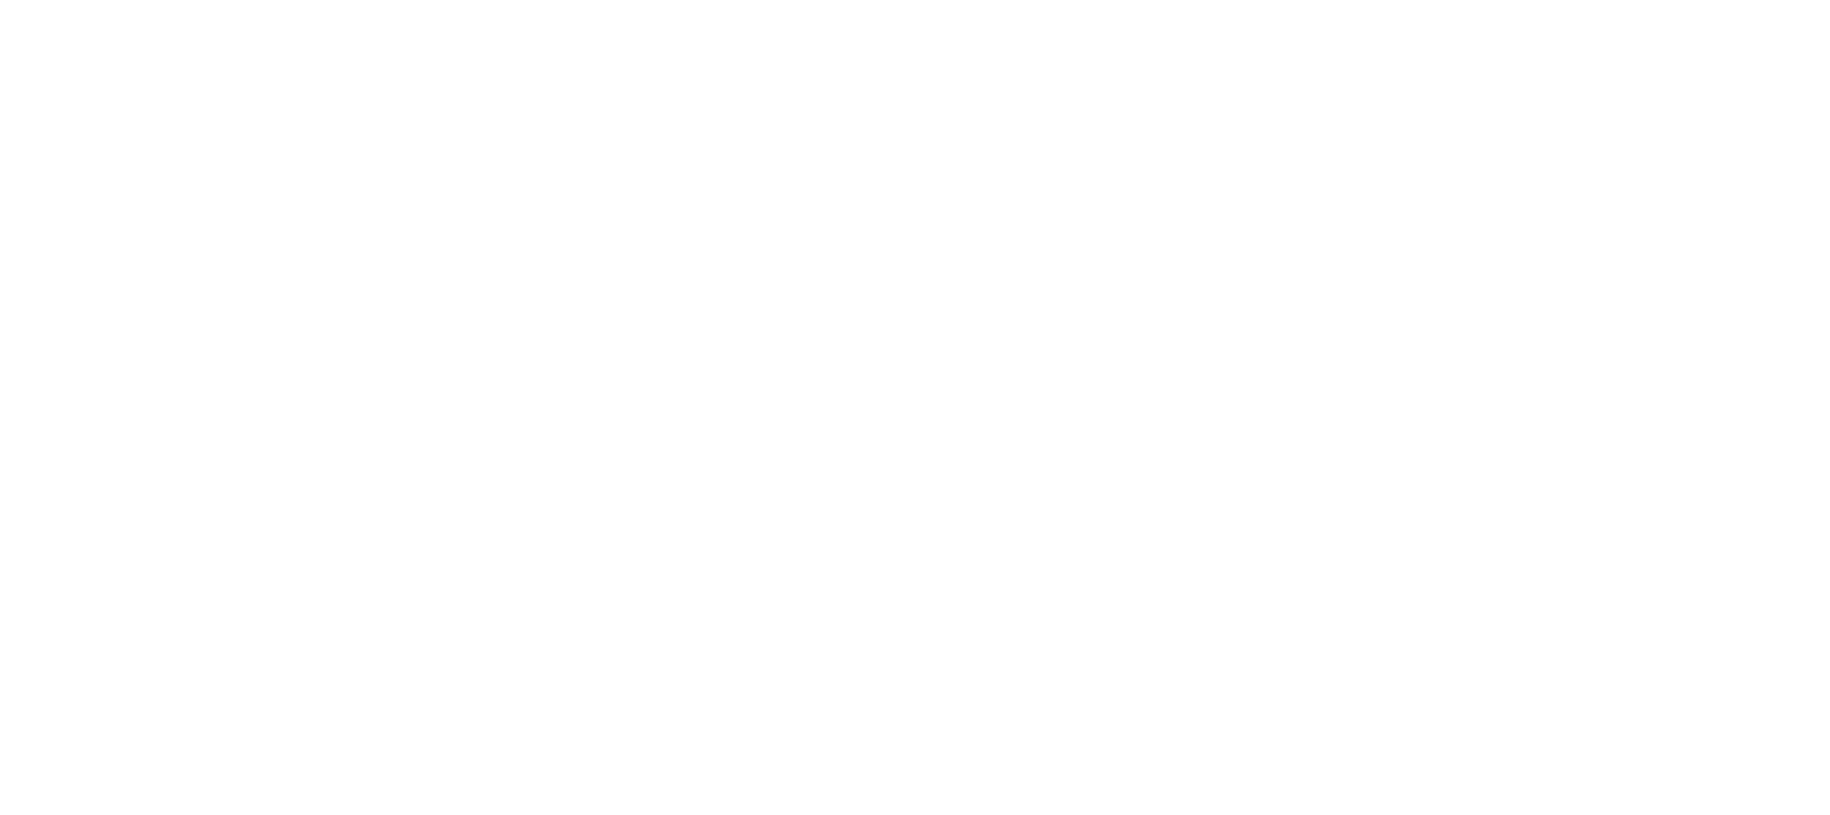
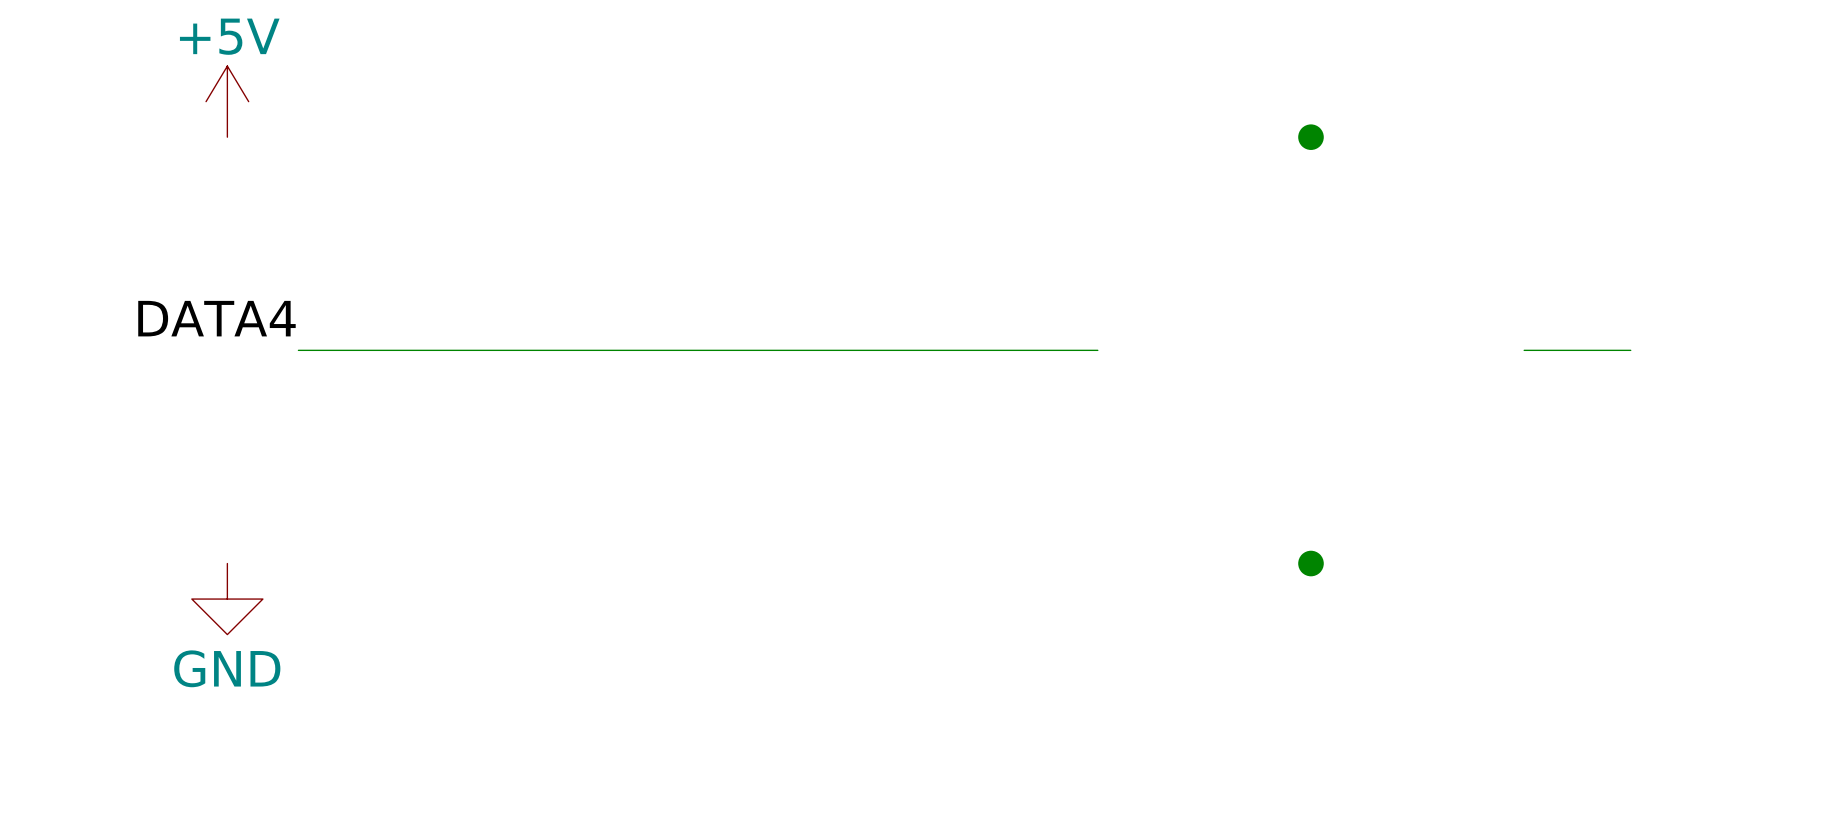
power symbol: none -> +5V (227, 101)
junction: none -> (1310, 137)
label: none -> DATA4 (216, 318)
wire: none -> (298, 350) (1097, 350)
wire: none -> (1524, 350) (1630, 350)
junction: none -> (1310, 563)
power symbol: none -> GND (227, 599)

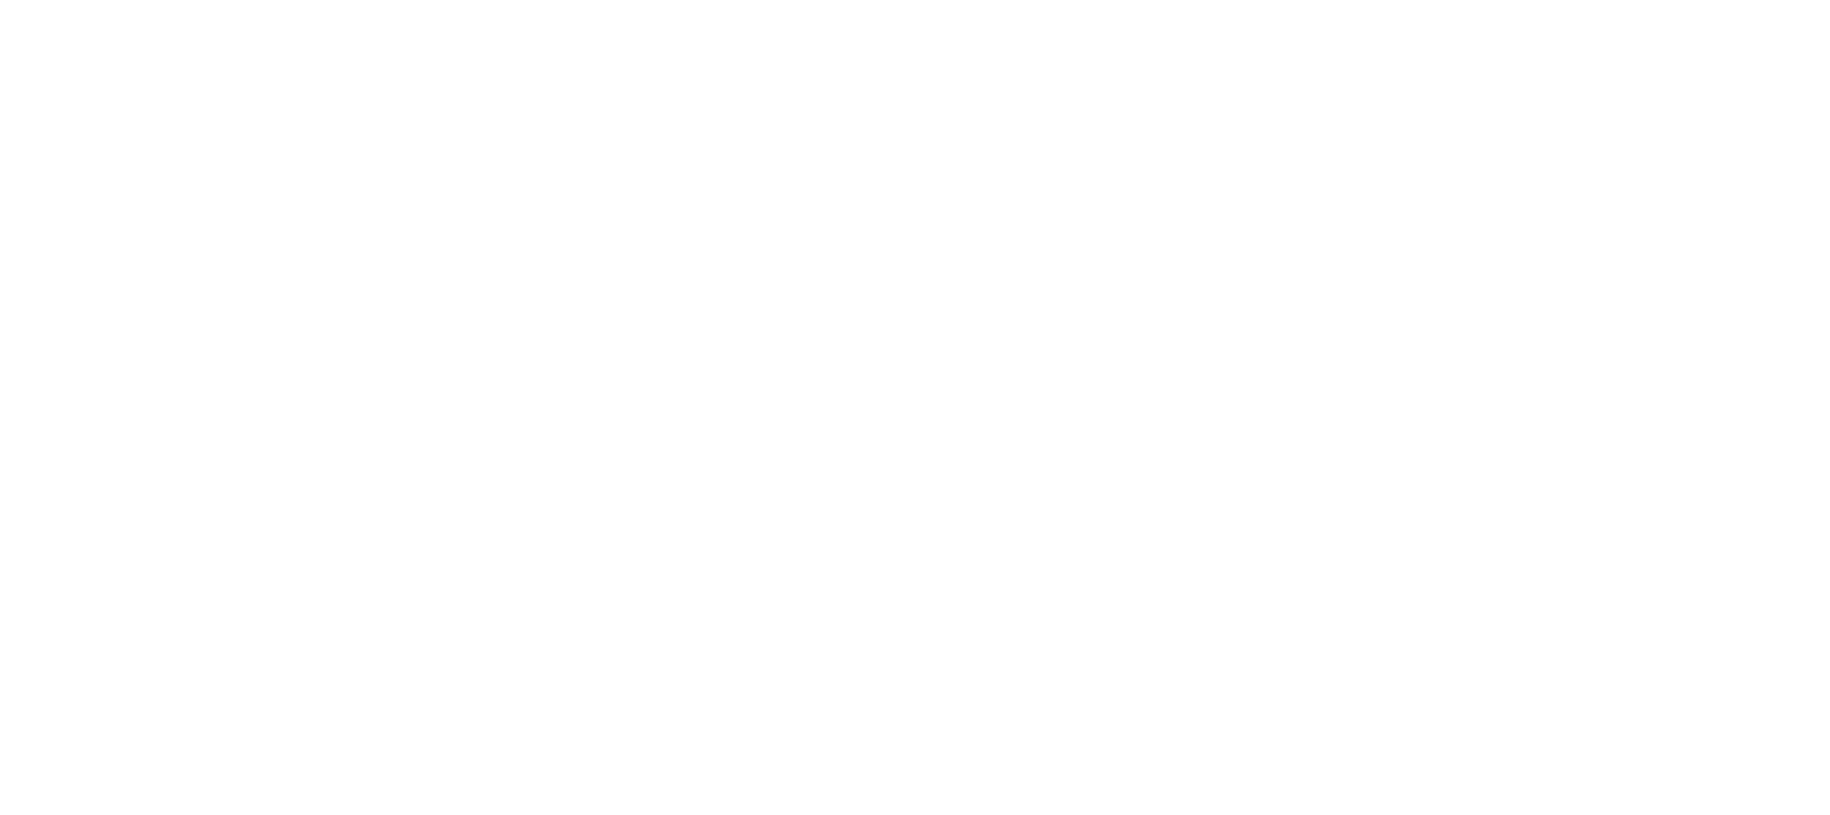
power symbol: +5V (227, 101) -> none
junction: (1310, 137) -> none
label: DATA4 (216, 318) -> none
wire: (298, 350) (1097, 350) -> none
wire: (1524, 350) (1630, 350) -> none
junction: (1310, 563) -> none
power symbol: GND (227, 599) -> none

